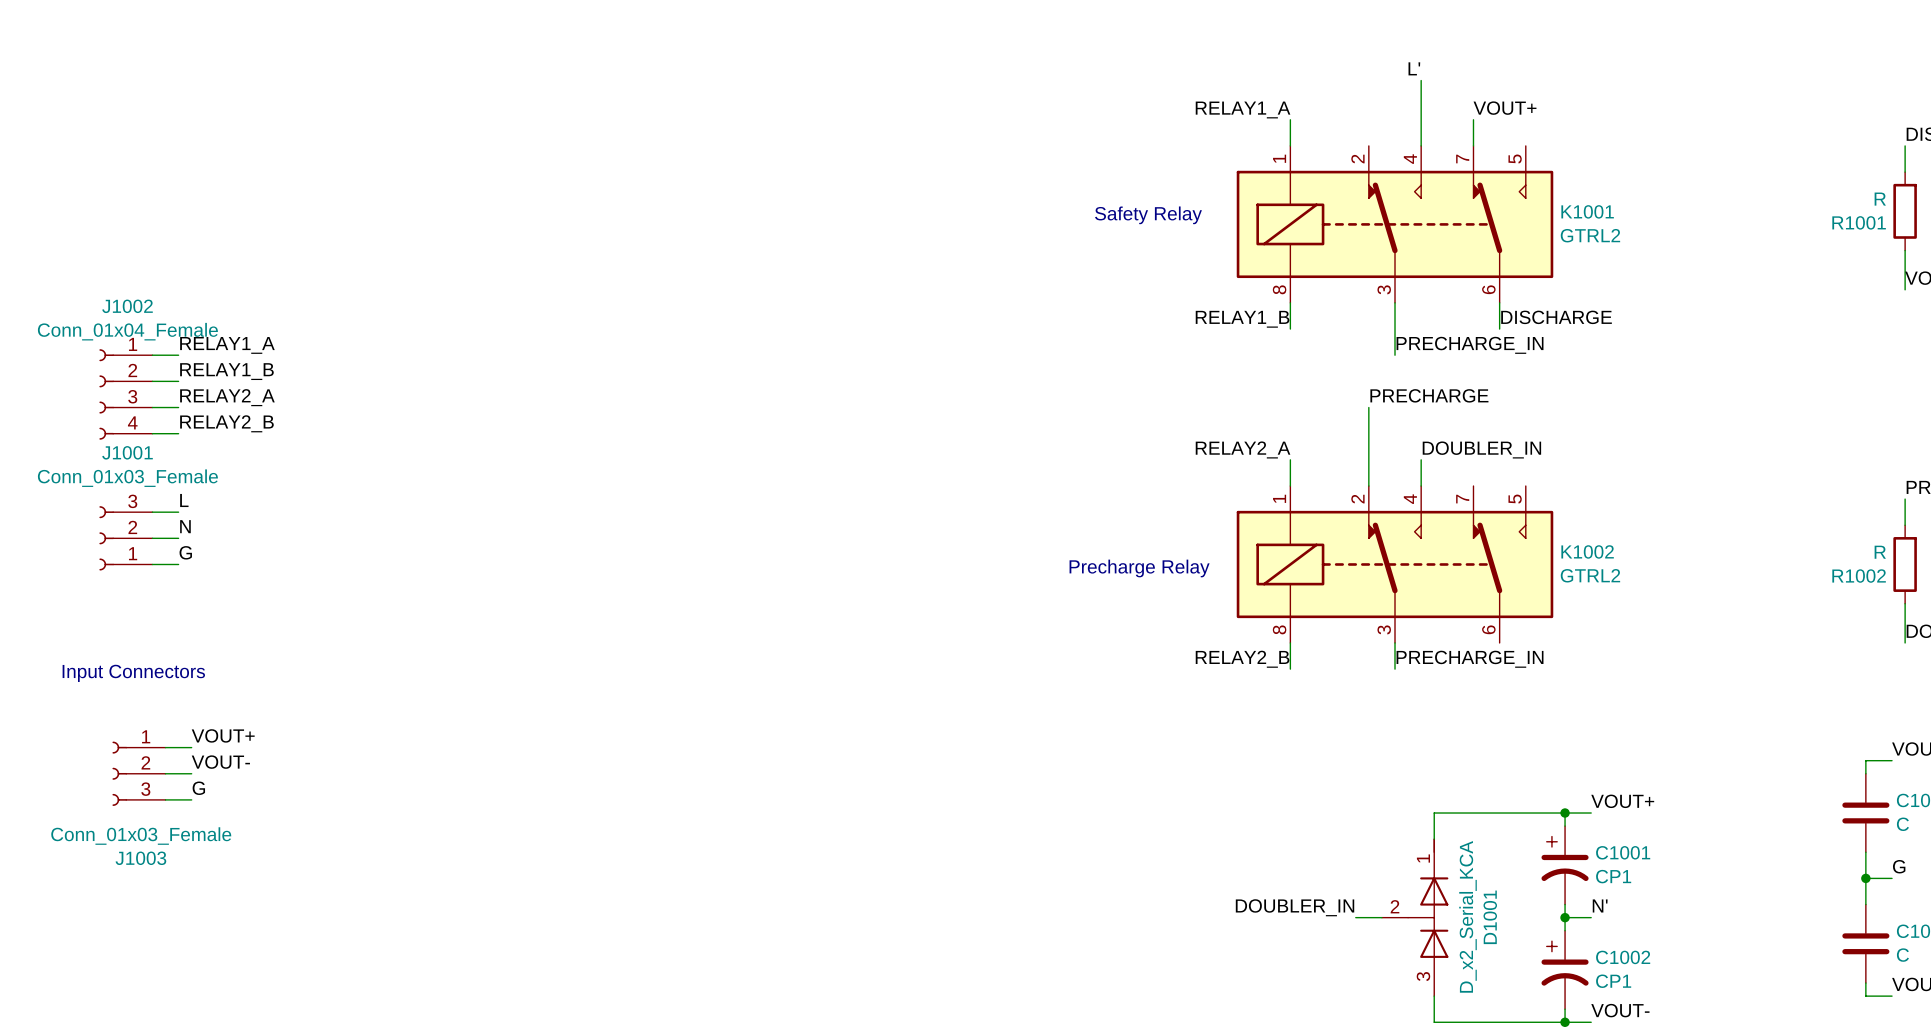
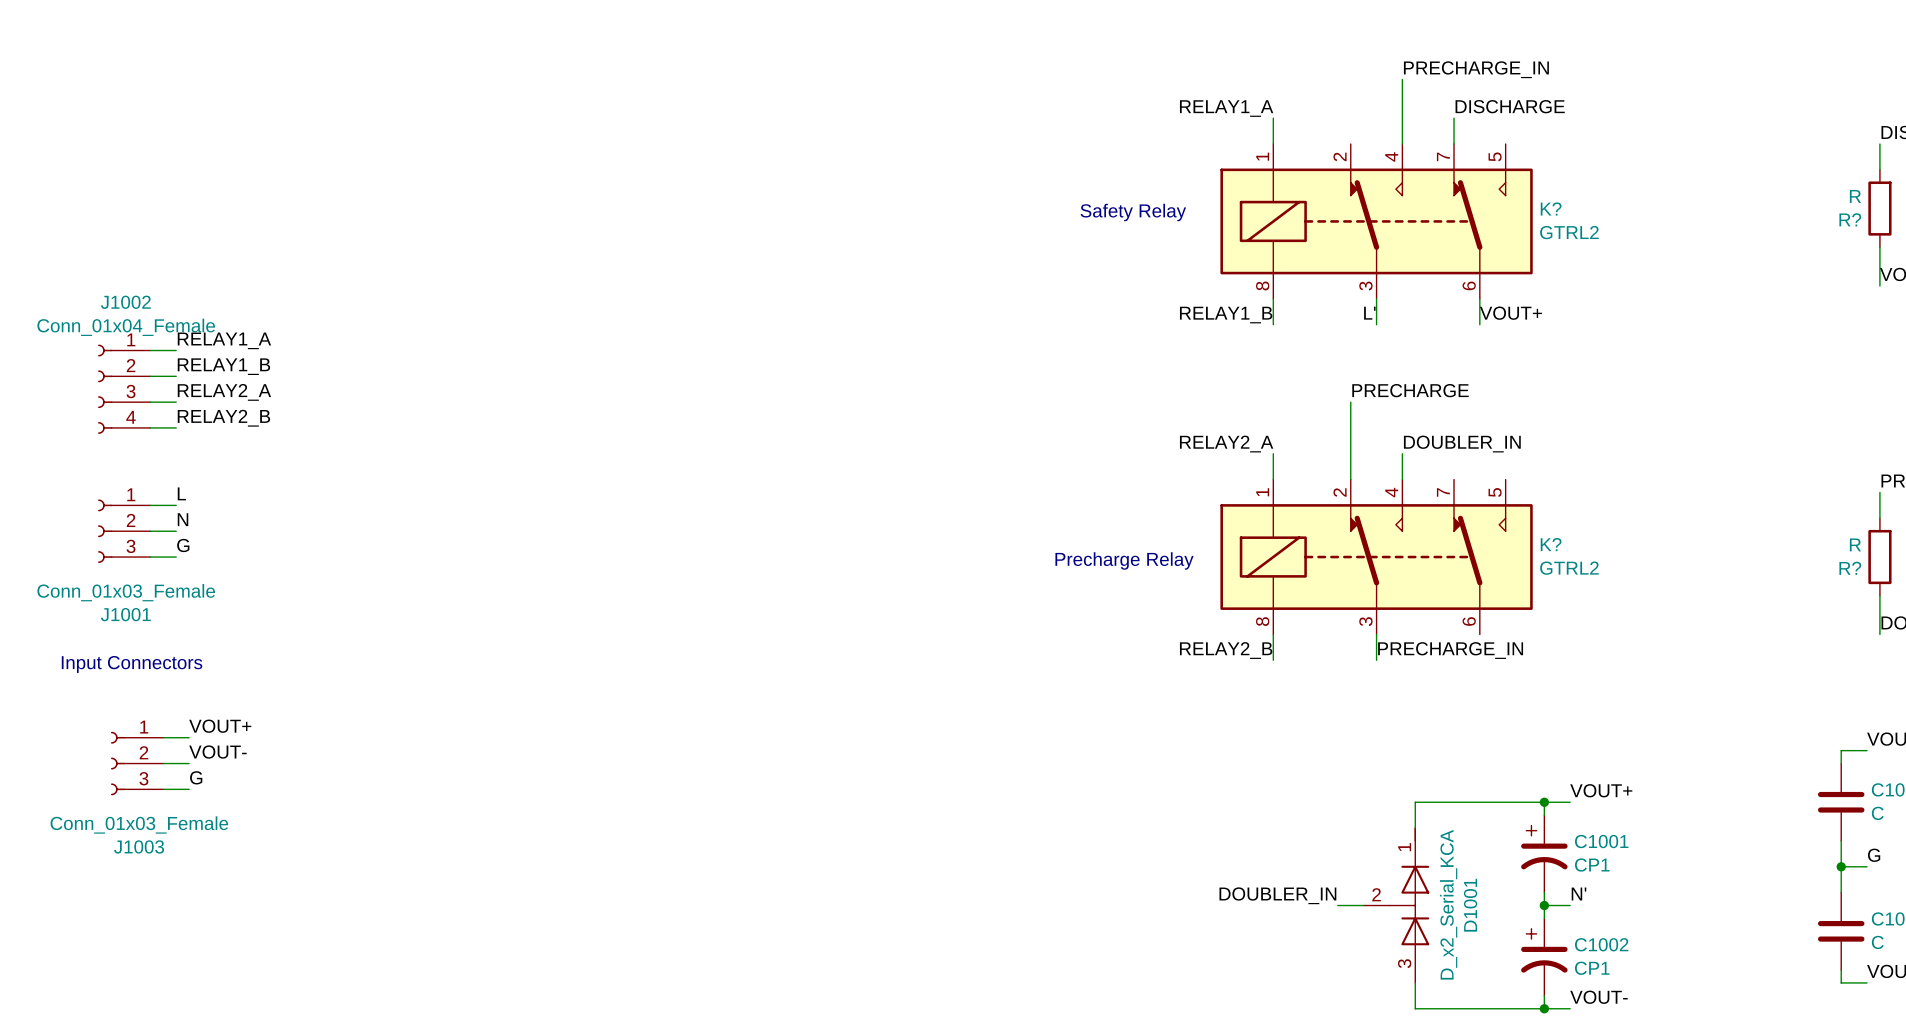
label: L' (1414, 68) -> PRECHARGE_IN (1476, 69)
label: VOUT+ (1505, 108) -> DISCHARGE (1510, 106)
K1001 name: K1001 (1587, 211) -> K? (1551, 209)
R1001 name: R1001 (1859, 222) -> R? (1850, 219)
label: none -> L' (1369, 313)
label: DISCHARGE (1556, 317) -> VOUT+ (1510, 313)
wire: (1395, 329) (1395, 355) -> none
label: PRECHARGE_IN (1470, 345) -> none
J1001 flip: as is (106, 538) -> up-down (105, 531)
K1002 name: K1002 (1587, 551) -> K? (1551, 544)
R1002 name: R1002 (1859, 576) -> R? (1850, 568)

